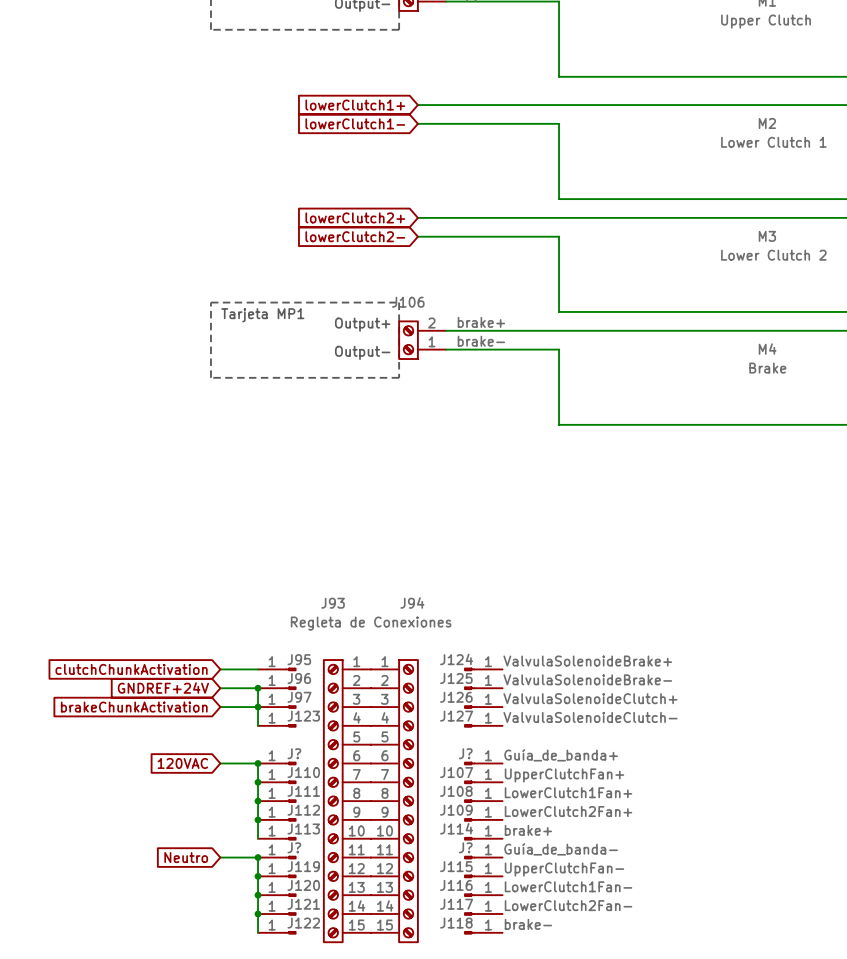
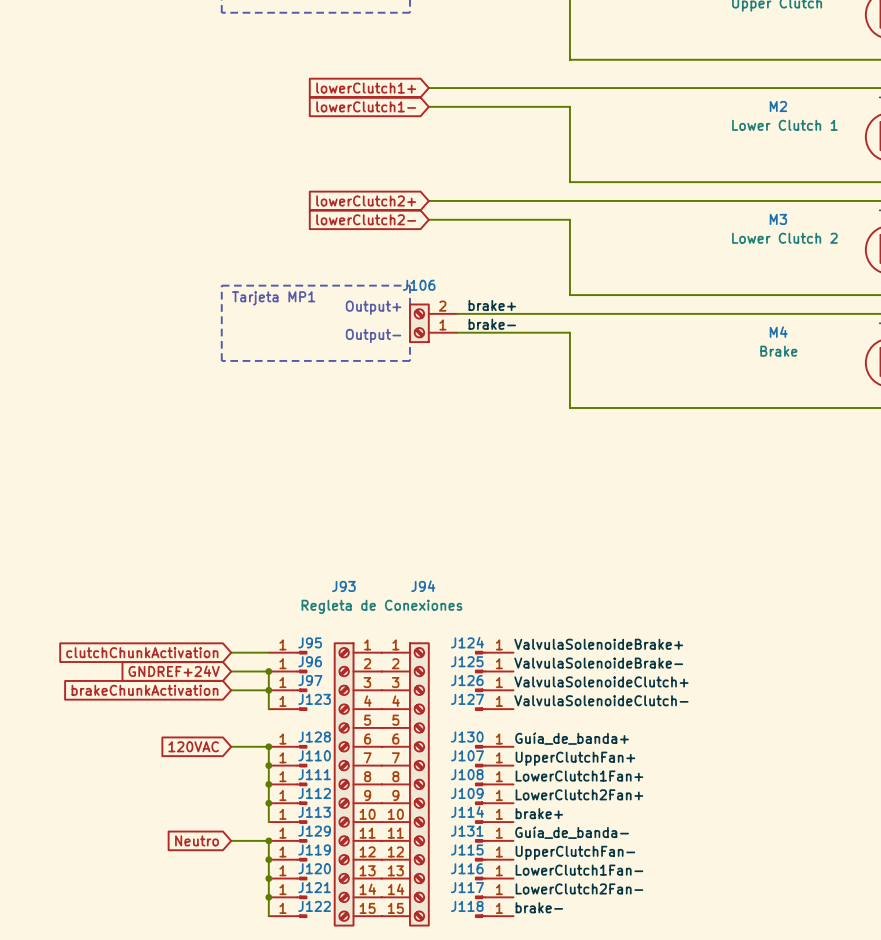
J? name: J? (294, 753) -> J128 (314, 737)
J? name: J? (465, 753) -> J130 (467, 737)
J? name: J? (294, 847) -> J129 (314, 831)
J? name: J? (465, 847) -> J131 (467, 831)

